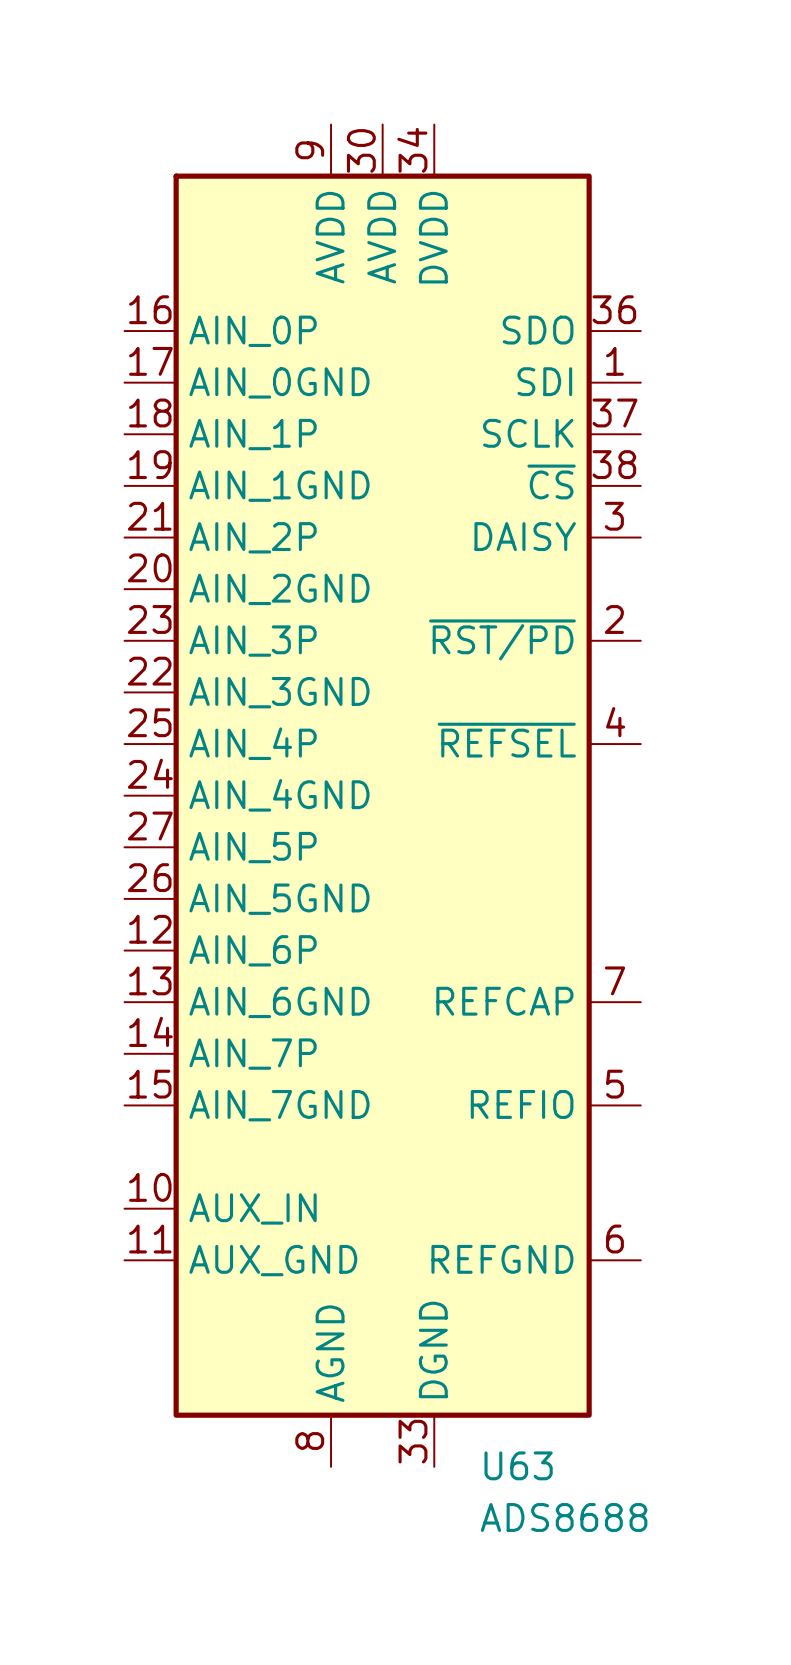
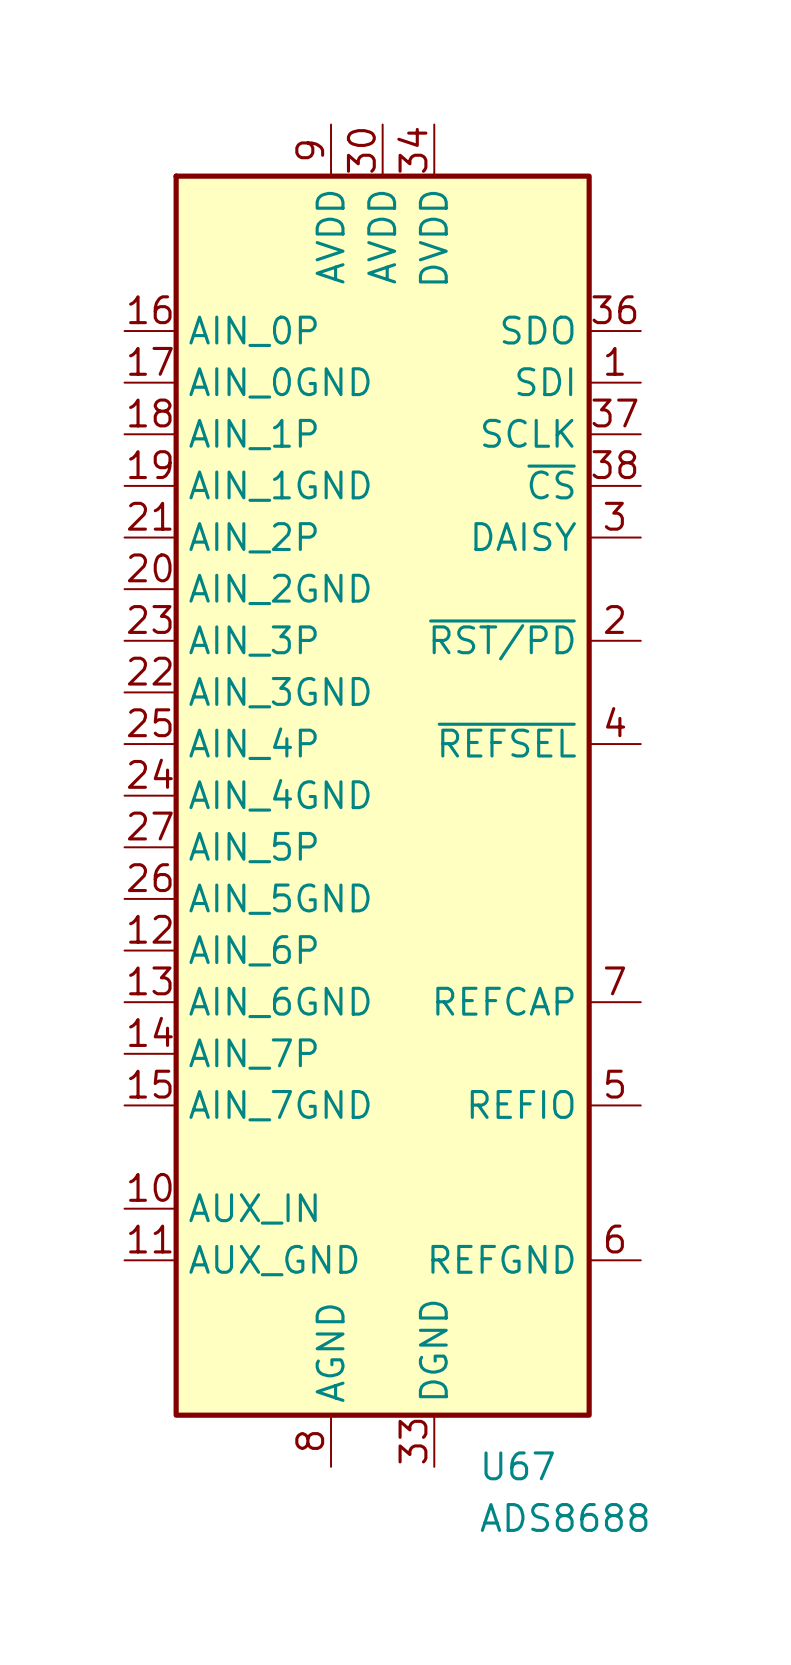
U63 name: U63 (518, 1465) -> U67 (519, 1465)

